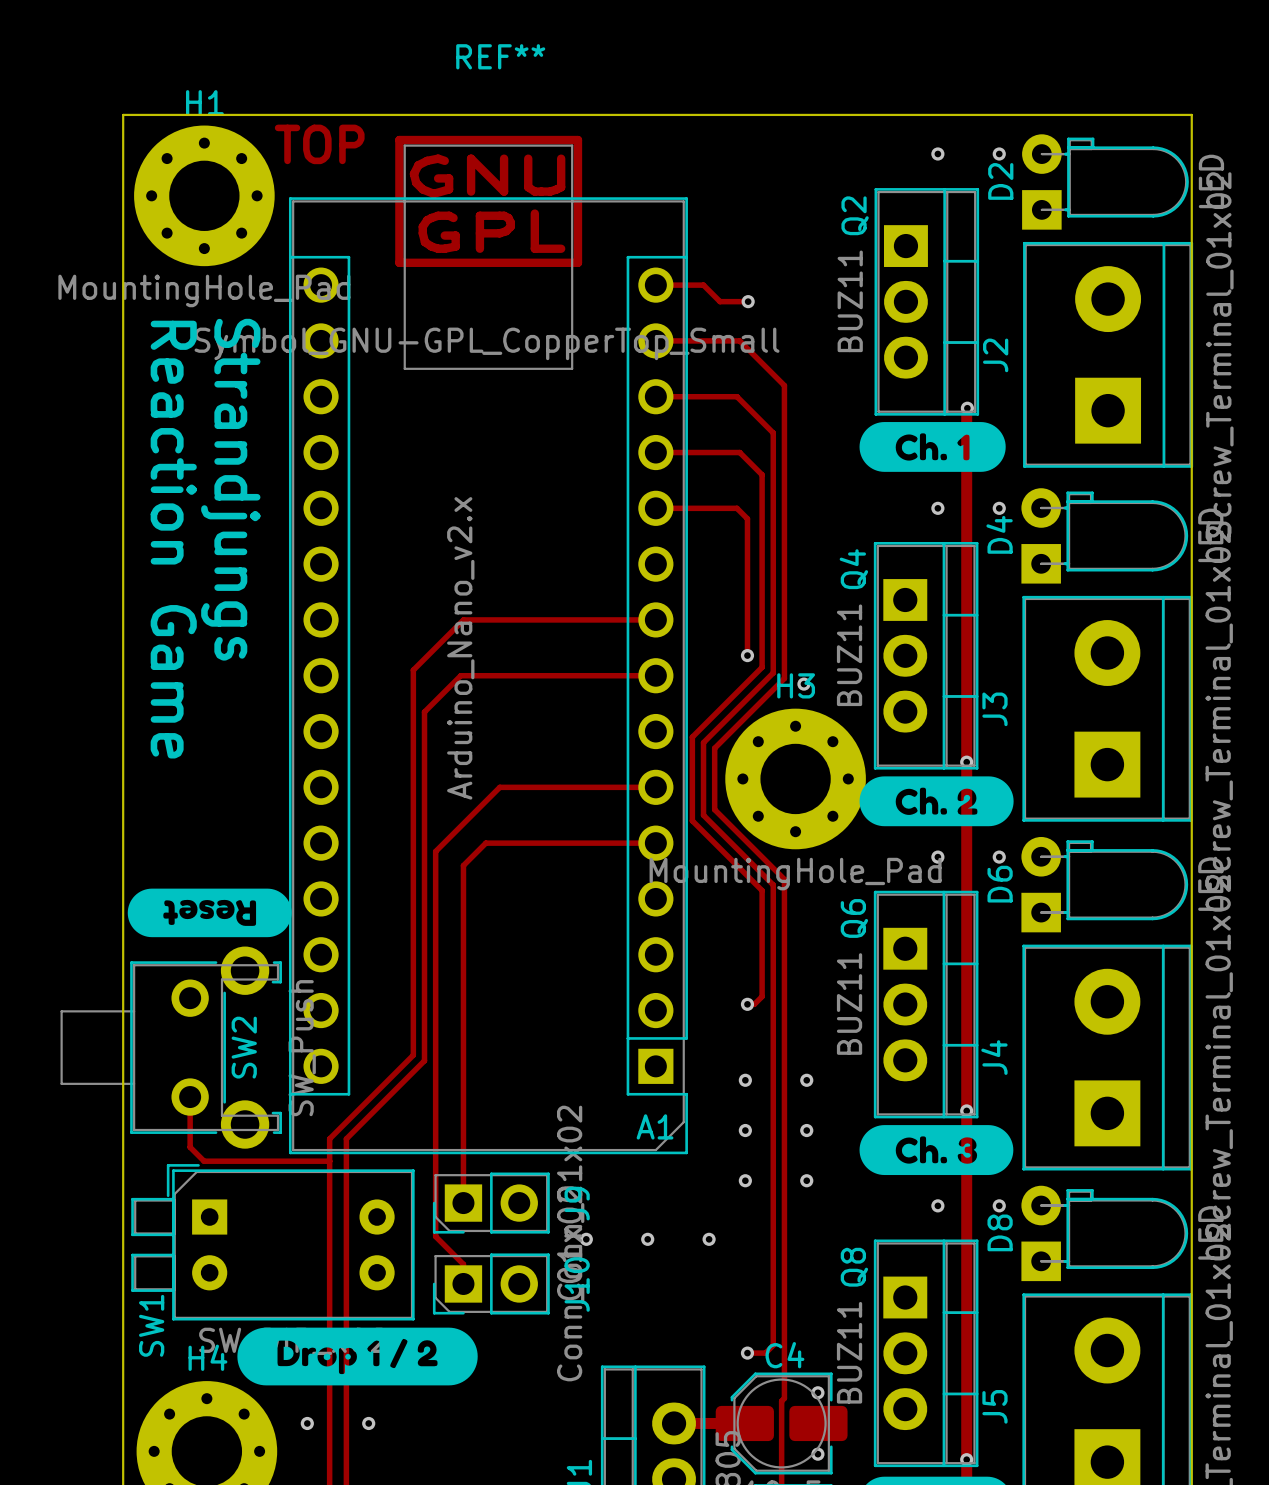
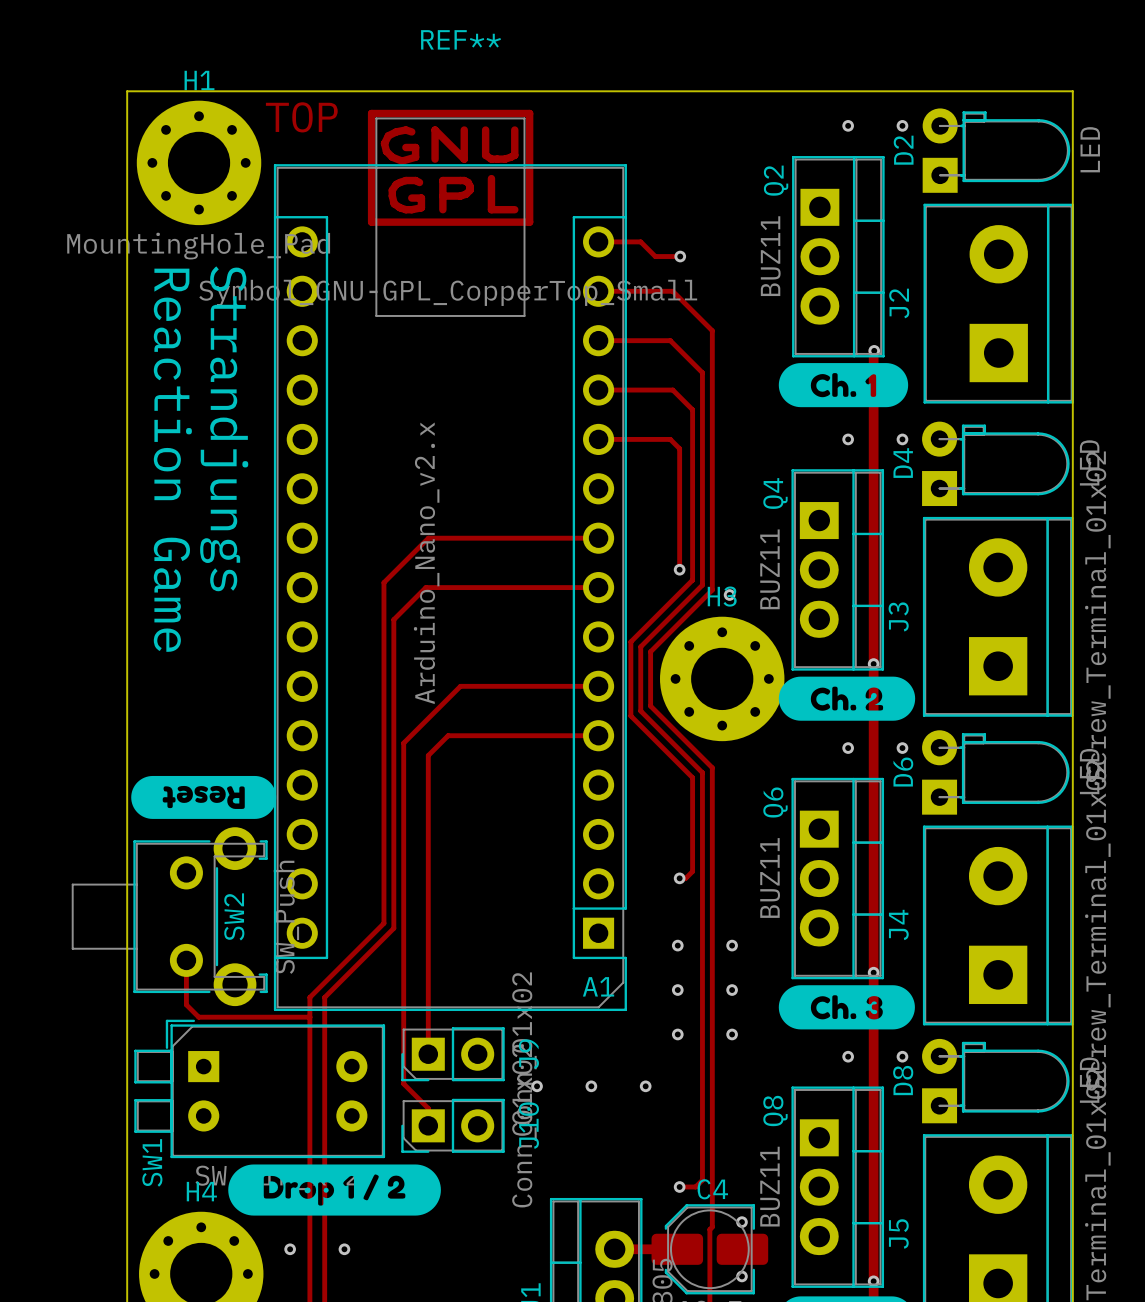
J2 value: Screw_Terminal_01x02 (1219, 354) -> none
H3 value: MountingHole_Pad (795, 874) -> none

